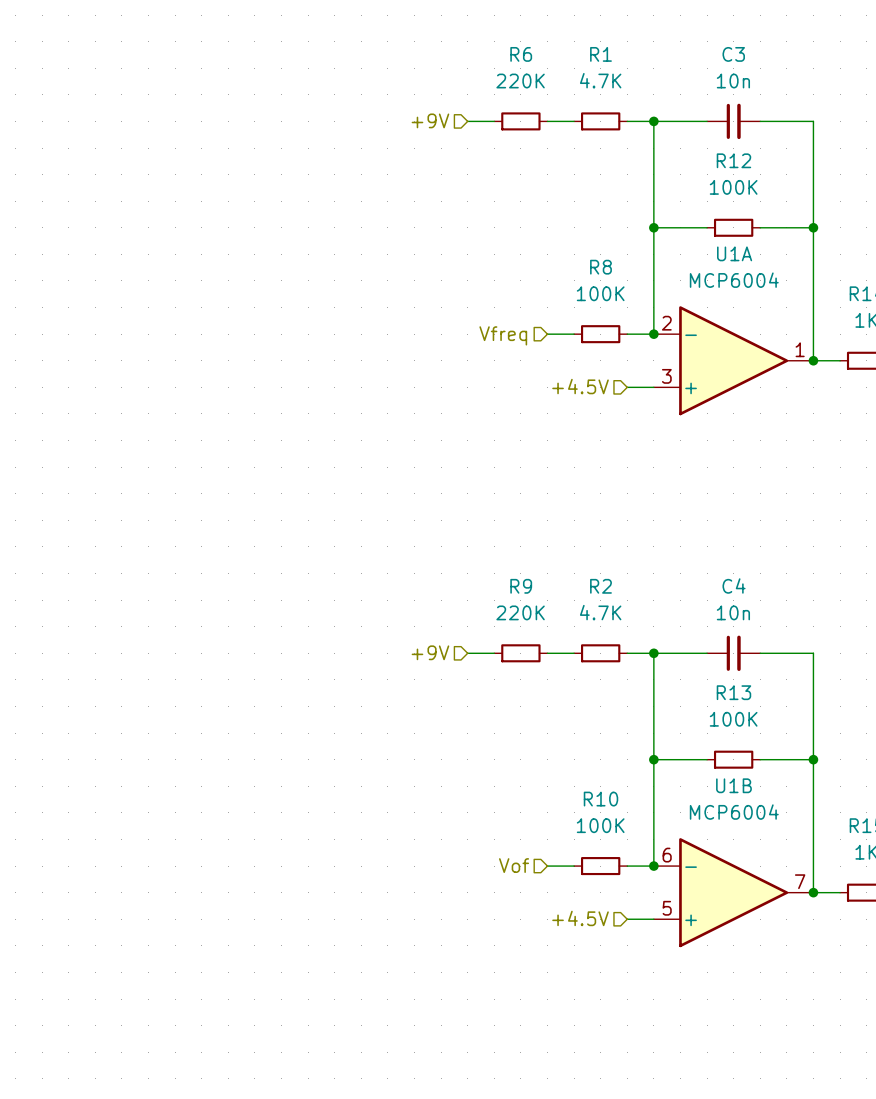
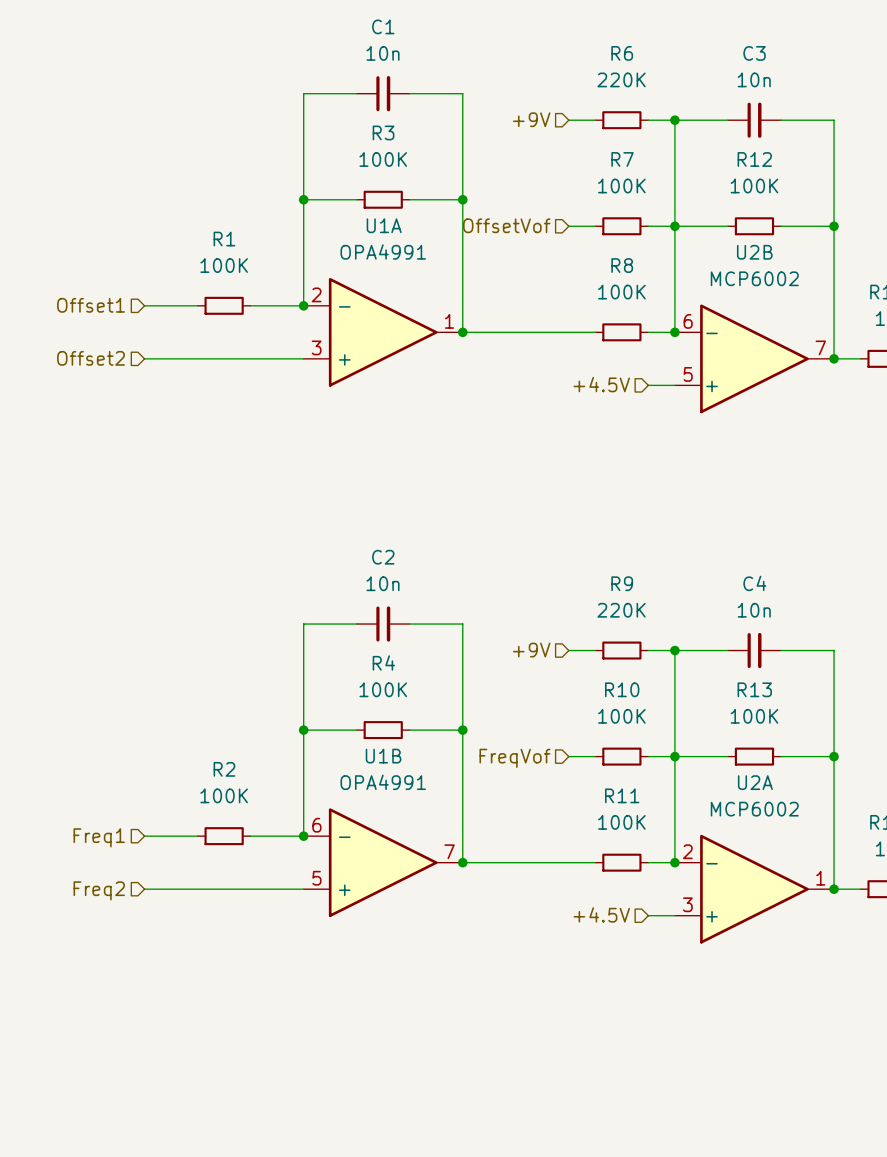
R1 name: R1 (600, 54) -> R6 (622, 53)
R1 value: 4.7K (600, 80) -> 220K (621, 79)
wire: none -> (356, 93) (303, 93) (303, 305) (250, 305)
C1: none -> 10n (383, 93)
wire: none -> (409, 93) (462, 93) (462, 332) (568, 332)
hierarchical label position: +9V (430, 120) -> +9V (531, 119)
wire: (467, 121) (494, 121) -> (568, 226) (595, 226)
R6: 220K (520, 121) -> none
wire: none -> (303, 199) (356, 199)
junction: none -> (303, 199)
R3: none -> 100K (383, 199)
wire: none -> (409, 199) (462, 199)
junction: none -> (462, 199)
hierarchical label: none -> OffsetVof (506, 225)
R7: none -> 100K (621, 226)
wire: none -> (648, 226) (674, 226)
U1A value: MCP6004 (734, 280) -> OPA4991 (383, 251)
hierarchical label: none -> Offset1 (91, 305)
wire: none -> (144, 305) (197, 305)
R1: none -> 100K (224, 305)
junction: none -> (303, 305)
junction: none -> (462, 332)
hierarchical label: Vfreq (503, 335) -> none
hierarchical label: none -> Offset2 (91, 358)
wire: none -> (144, 358) (303, 358)
U1A position: (733, 360) -> (383, 332)
U2B: none -> MCP6002 (754, 358)
R2 name: R2 (600, 586) -> R9 (622, 583)
R2 value: 4.7K (600, 612) -> 220K (621, 610)
wire: none -> (356, 624) (303, 624) (303, 836) (250, 836)
C2: none -> 10n (383, 624)
wire: none -> (409, 624) (462, 624) (462, 862) (568, 862)
hierarchical label position: +9V (430, 652) -> +9V (531, 650)
wire: (467, 653) (494, 653) -> (568, 756) (595, 756)
R9: 220K (520, 653) -> none
wire: none -> (303, 730) (356, 730)
junction: none -> (303, 730)
R4: none -> 100K (383, 730)
wire: none -> (409, 730) (462, 730)
junction: none -> (462, 730)
R10: none -> 100K (621, 756)
wire: none -> (648, 756) (674, 756)
hierarchical label: none -> FreqVof (514, 758)
R10 name: R10 (600, 799) -> R11 (622, 795)
U1B value: MCP6004 (734, 812) -> OPA4991 (383, 782)
wire: none -> (144, 836) (197, 836)
R2: none -> 100K (224, 836)
junction: none -> (303, 836)
hierarchical label: none -> Freq1 (99, 837)
hierarchical label: Vof (514, 865) -> none
junction: none -> (462, 862)
wire: none -> (144, 889) (303, 889)
U1B position: (733, 892) -> (383, 862)
U2A: none -> MCP6002 (754, 889)
hierarchical label: none -> Freq2 (99, 890)

